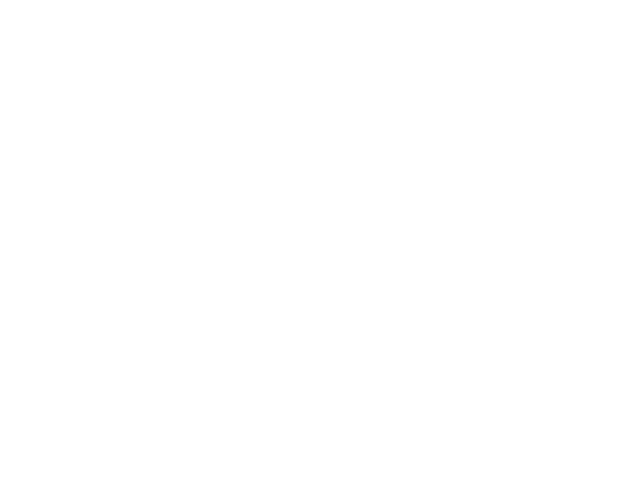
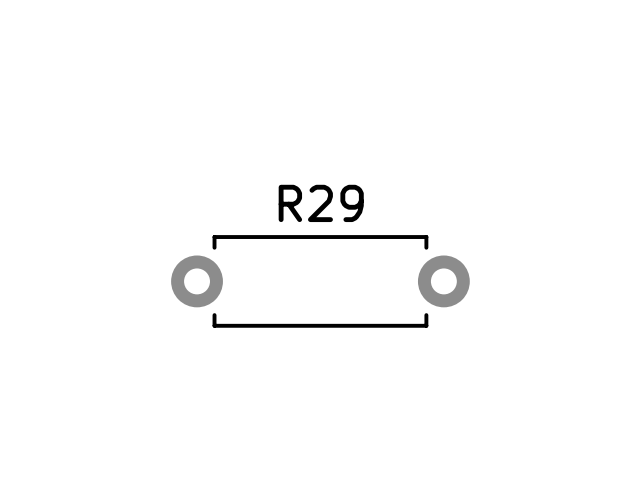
R29: none -> (320, 281)

